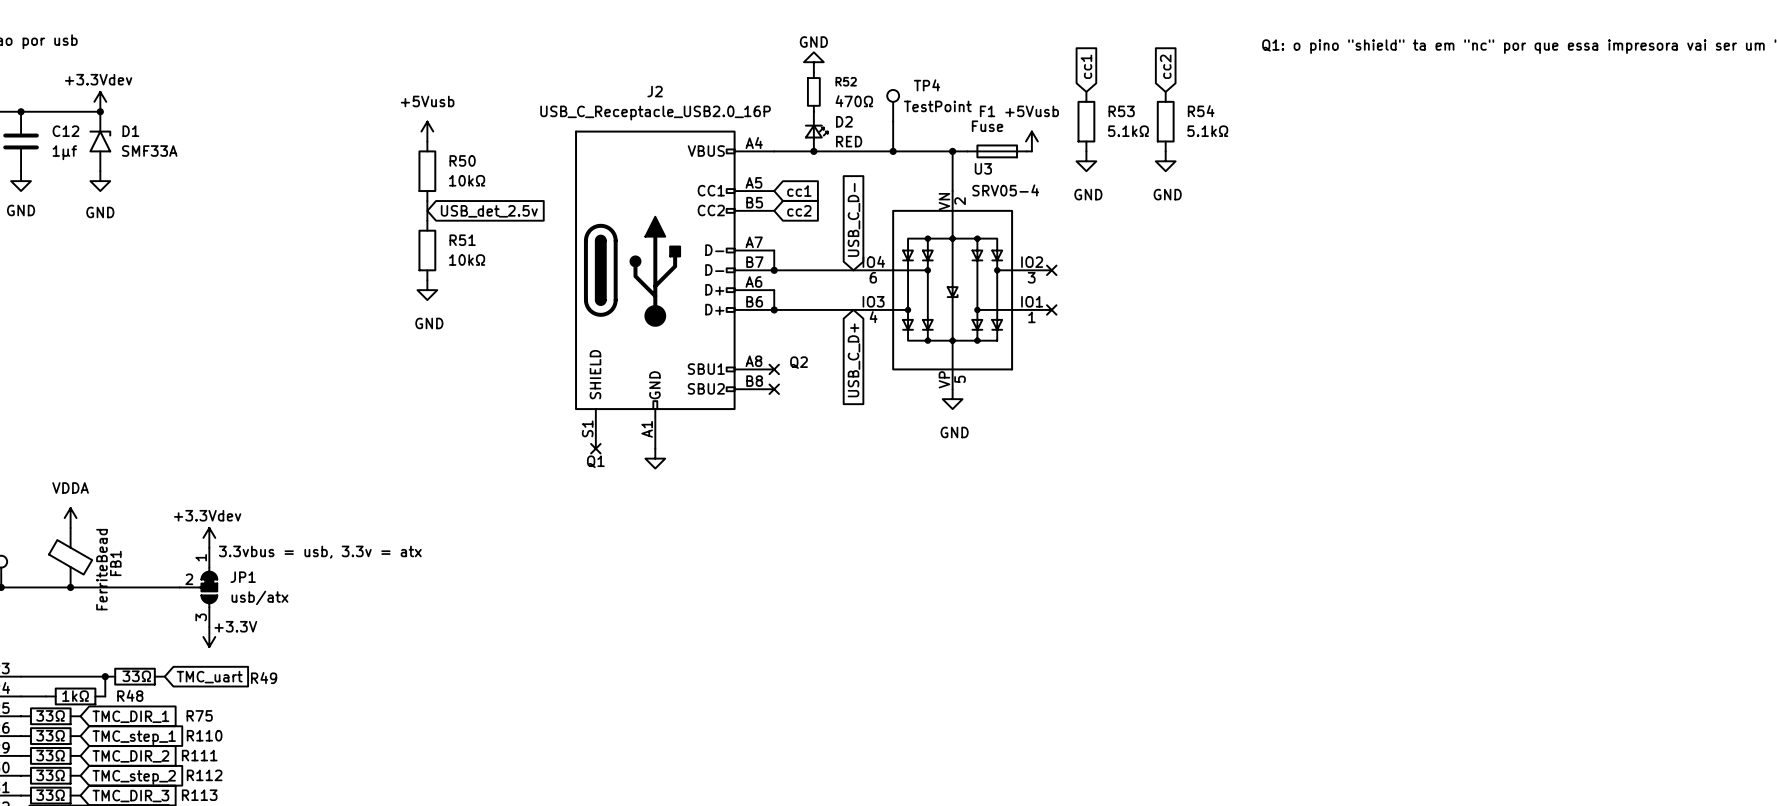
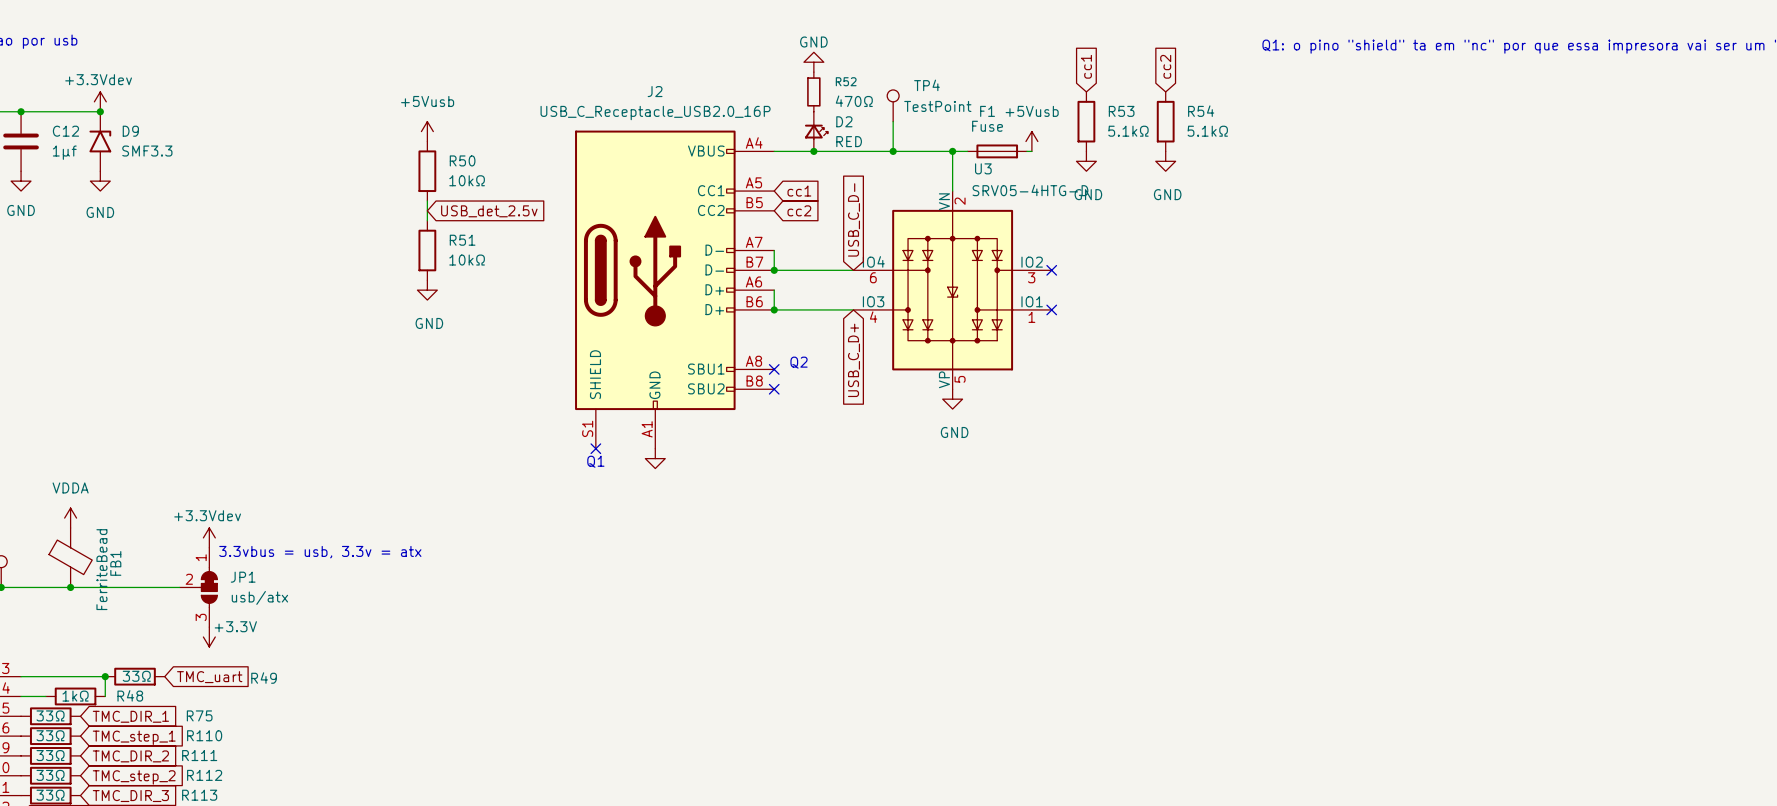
D1 name: D1 (130, 131) -> D9 (130, 131)
D1 value: SMF33A (149, 151) -> SMF3.3 (147, 151)
U3 value: SRV05-4 (1005, 190) -> SRV05-4HTG-D (1030, 190)

